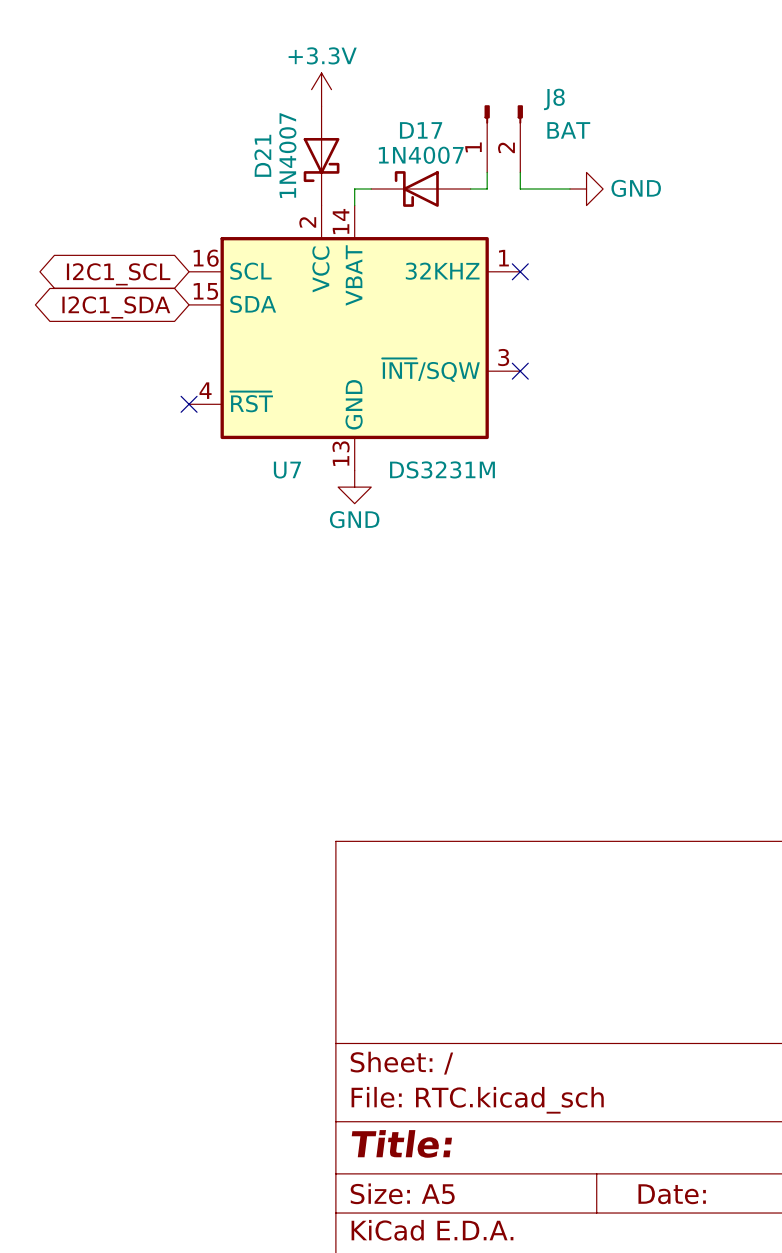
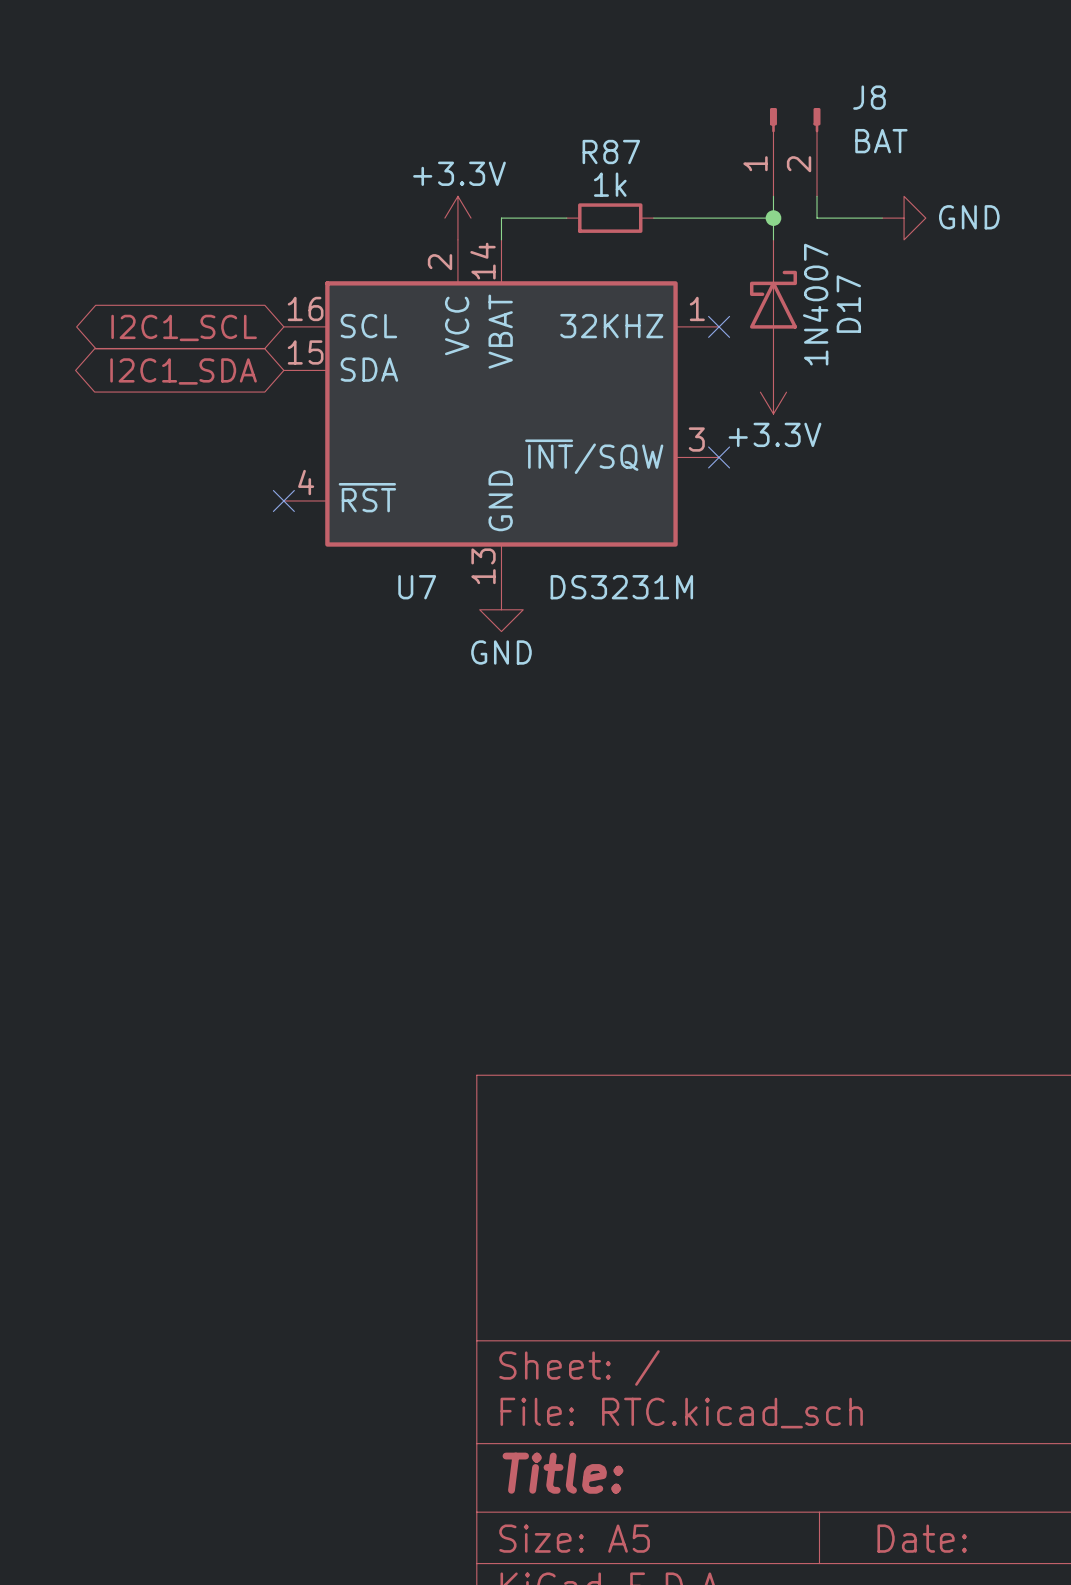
power symbol position: +3.3V (321, 89) -> +3.3V (457, 218)
J8 position: (503, 138) -> (795, 152)
D21: 1N4007 (321, 155) -> none
wire: (487, 172) (487, 189) -> (719, 218) (675, 218)
wire: (520, 172) (520, 189) -> none
wire: none -> (773, 196) (773, 239)
wire: none -> (817, 196) (817, 218) (882, 218)
D17 rotation: 0° (416, 189) -> 90° clockwise (773, 299)
D17 position: (420, 189) -> (773, 305)
R87: none -> 1k (610, 218)
junction: none -> (773, 218)
power symbol position: GND (586, 189) -> GND (904, 218)
power symbol: none -> +3.3V (773, 392)

